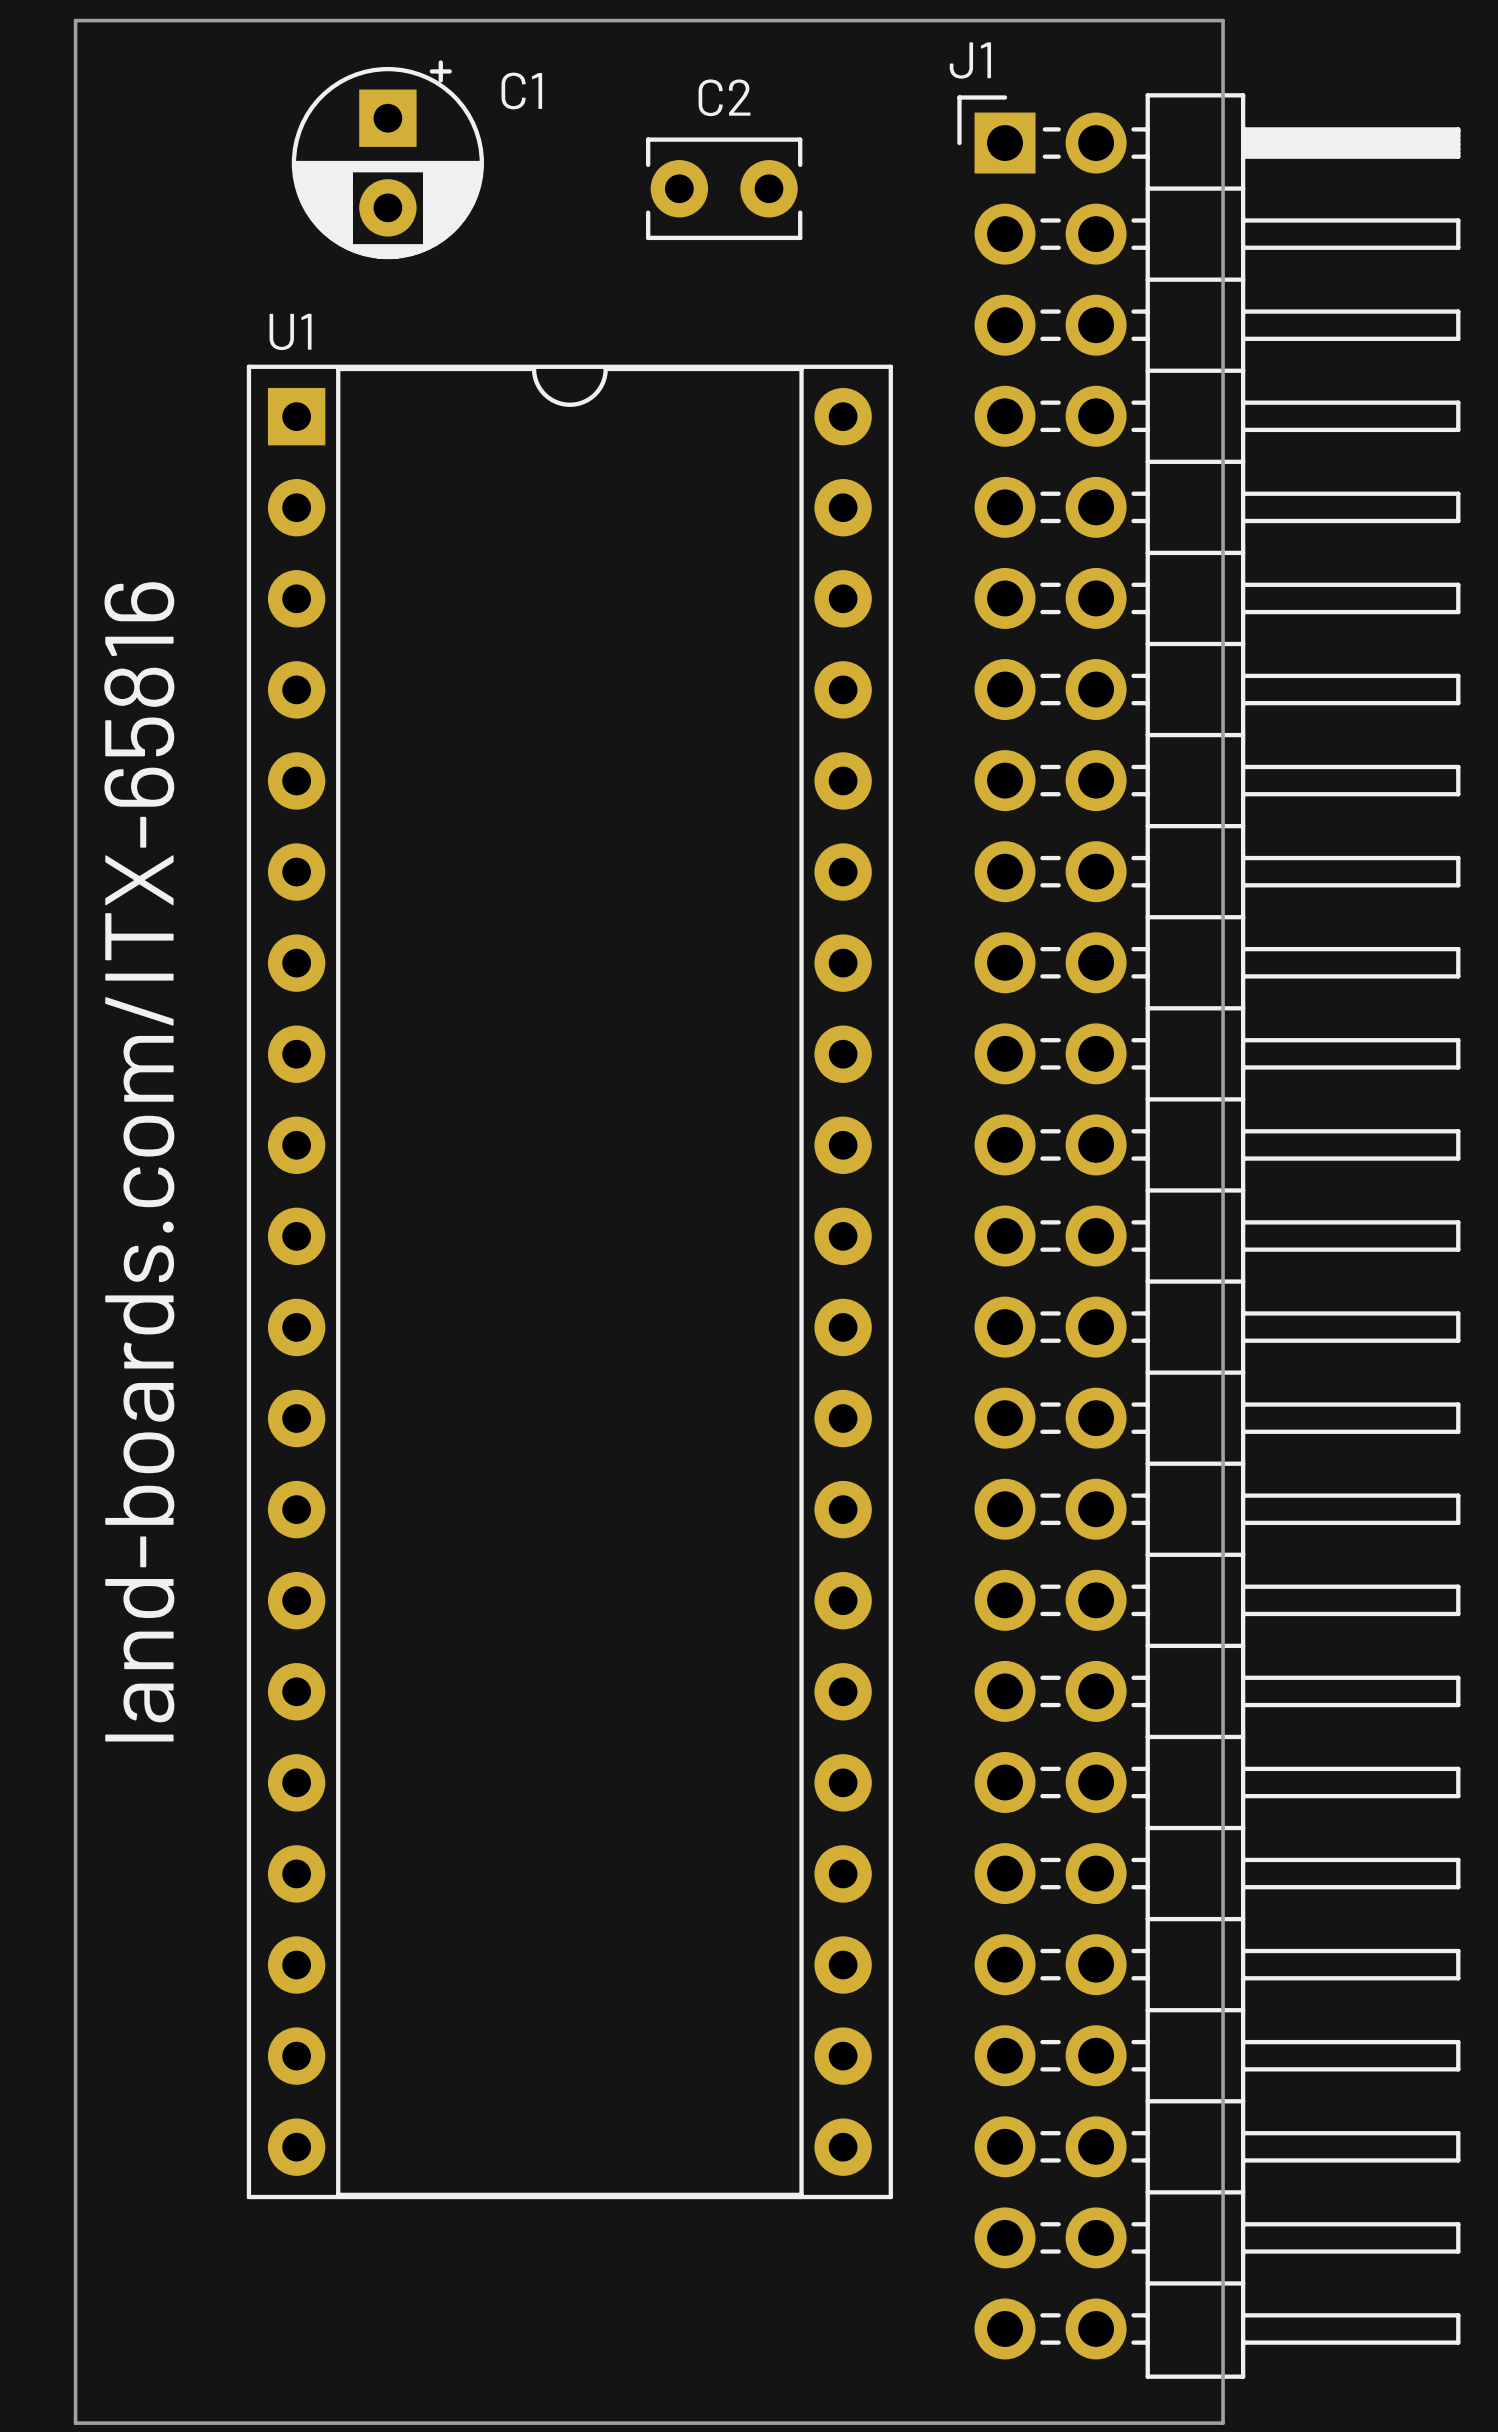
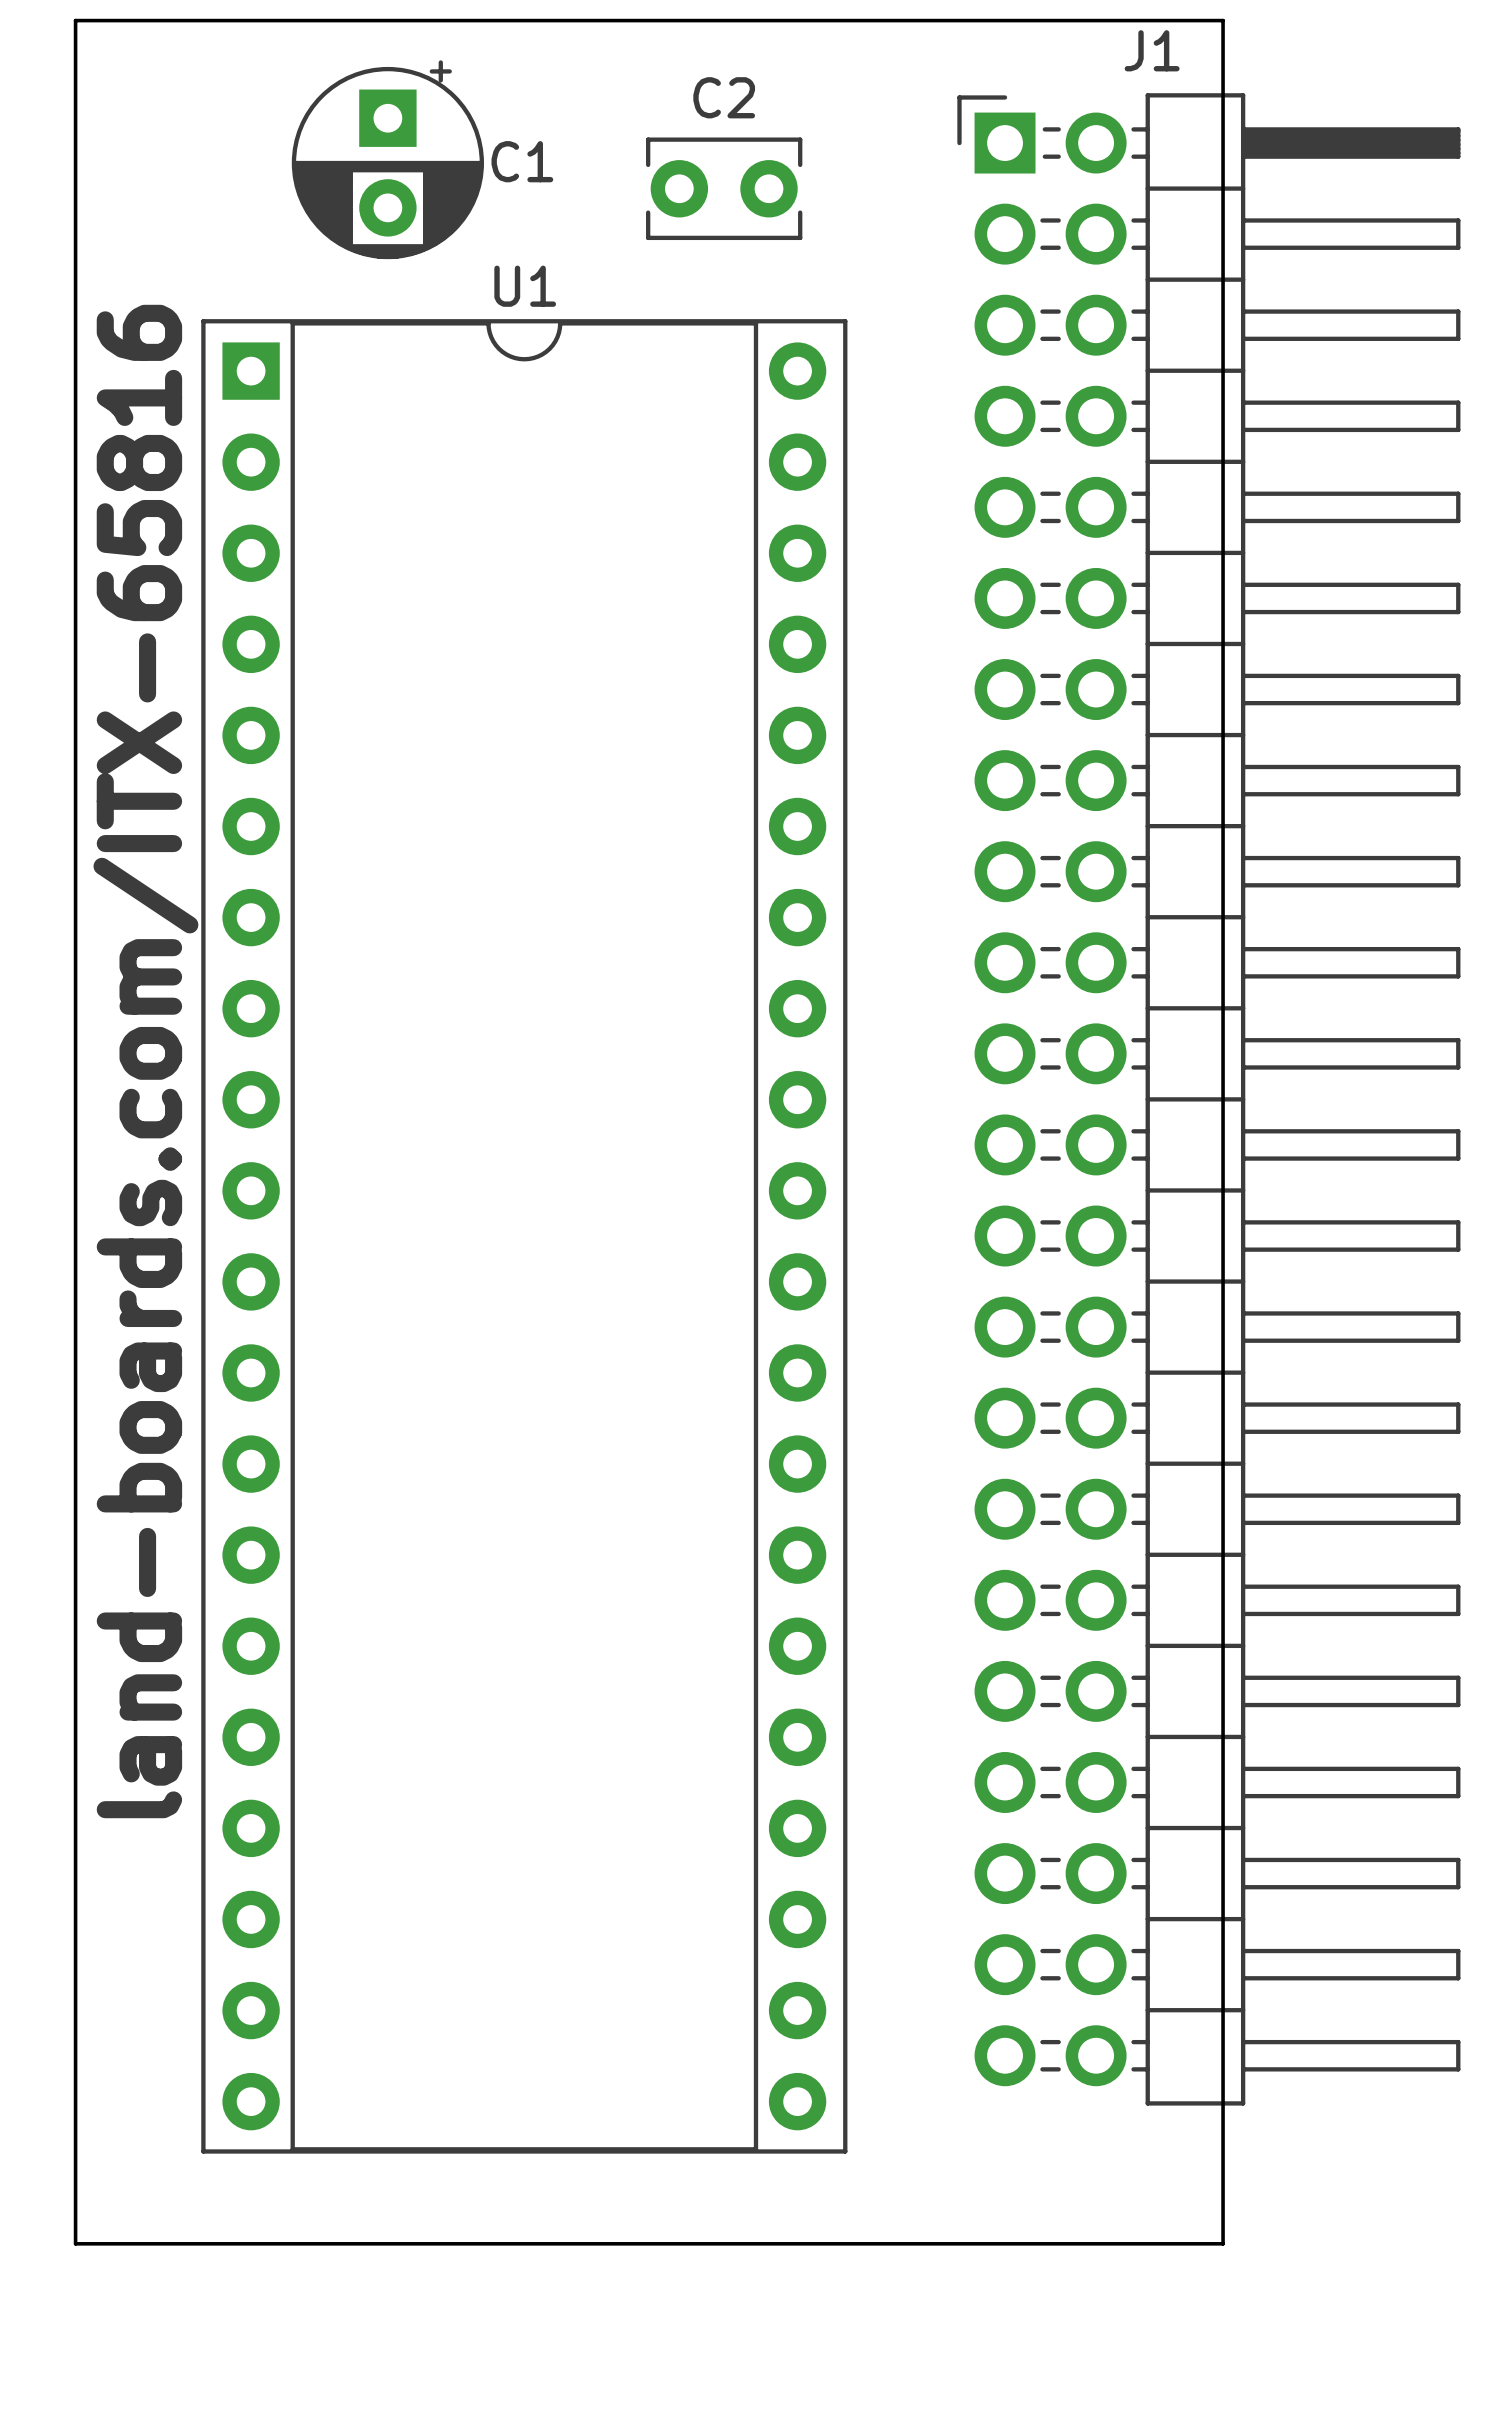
J1 name position: J1 (970, 60) -> J1 (1152, 50)
C1 name position: C1 (521, 90) -> C1 (522, 161)
J1 footprint: [957, 93, 1461, 2379] -> [957, 93, 1461, 2106]
U1 name position: U1 (290, 331) -> U1 (525, 286)
text position: land-boards.com/ITX-65816 (139, 1161) -> land-boards.com/ITX-65816 (145, 1061)
U1 position: (569, 1281) -> (524, 1236)
board edge: (75, 2243) (75, 2423) (1223, 2423) (1223, 2243) -> (75, 2243) (1223, 2243)

